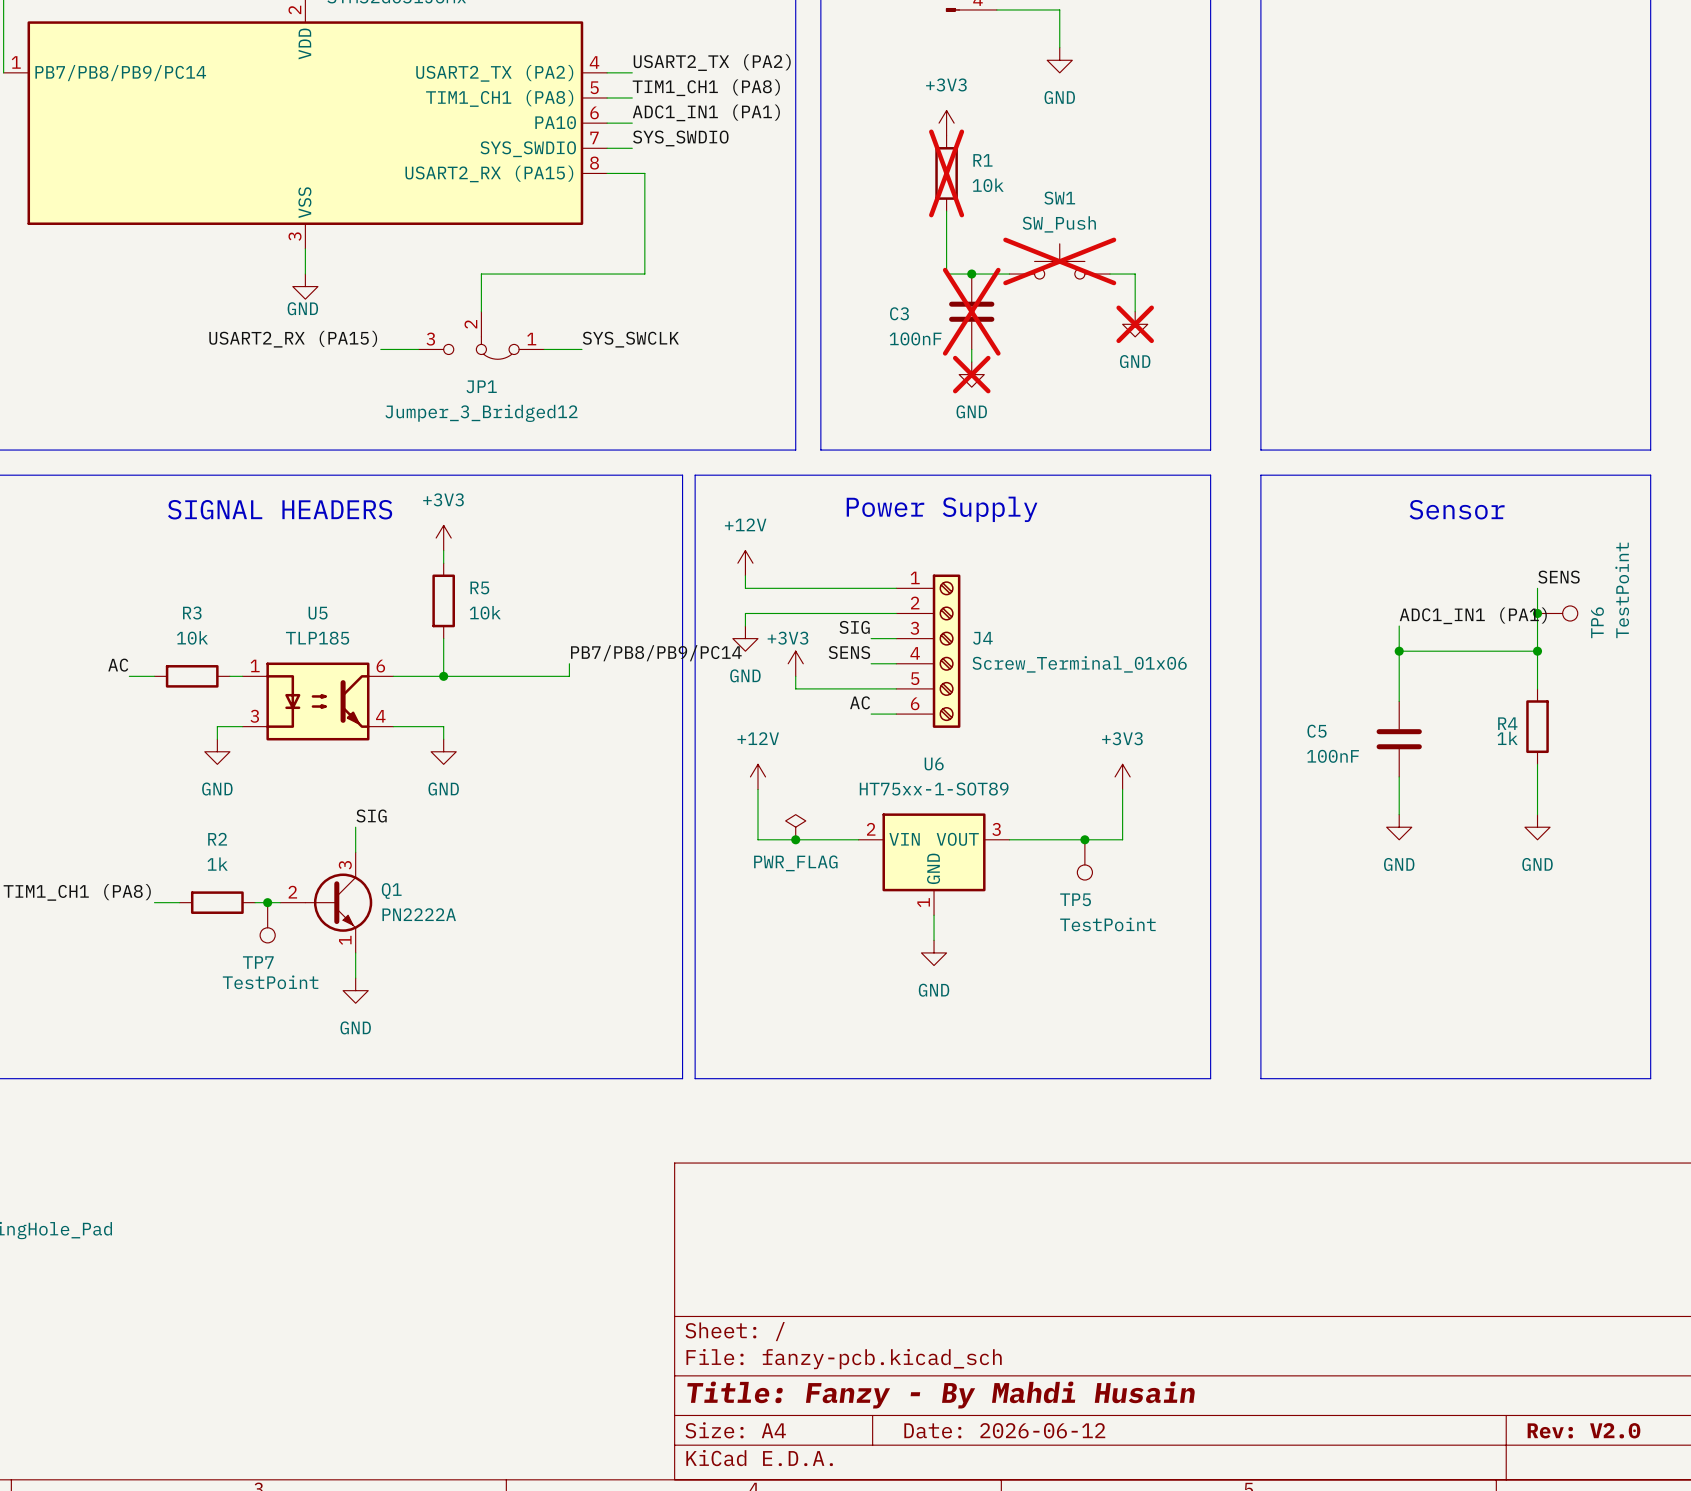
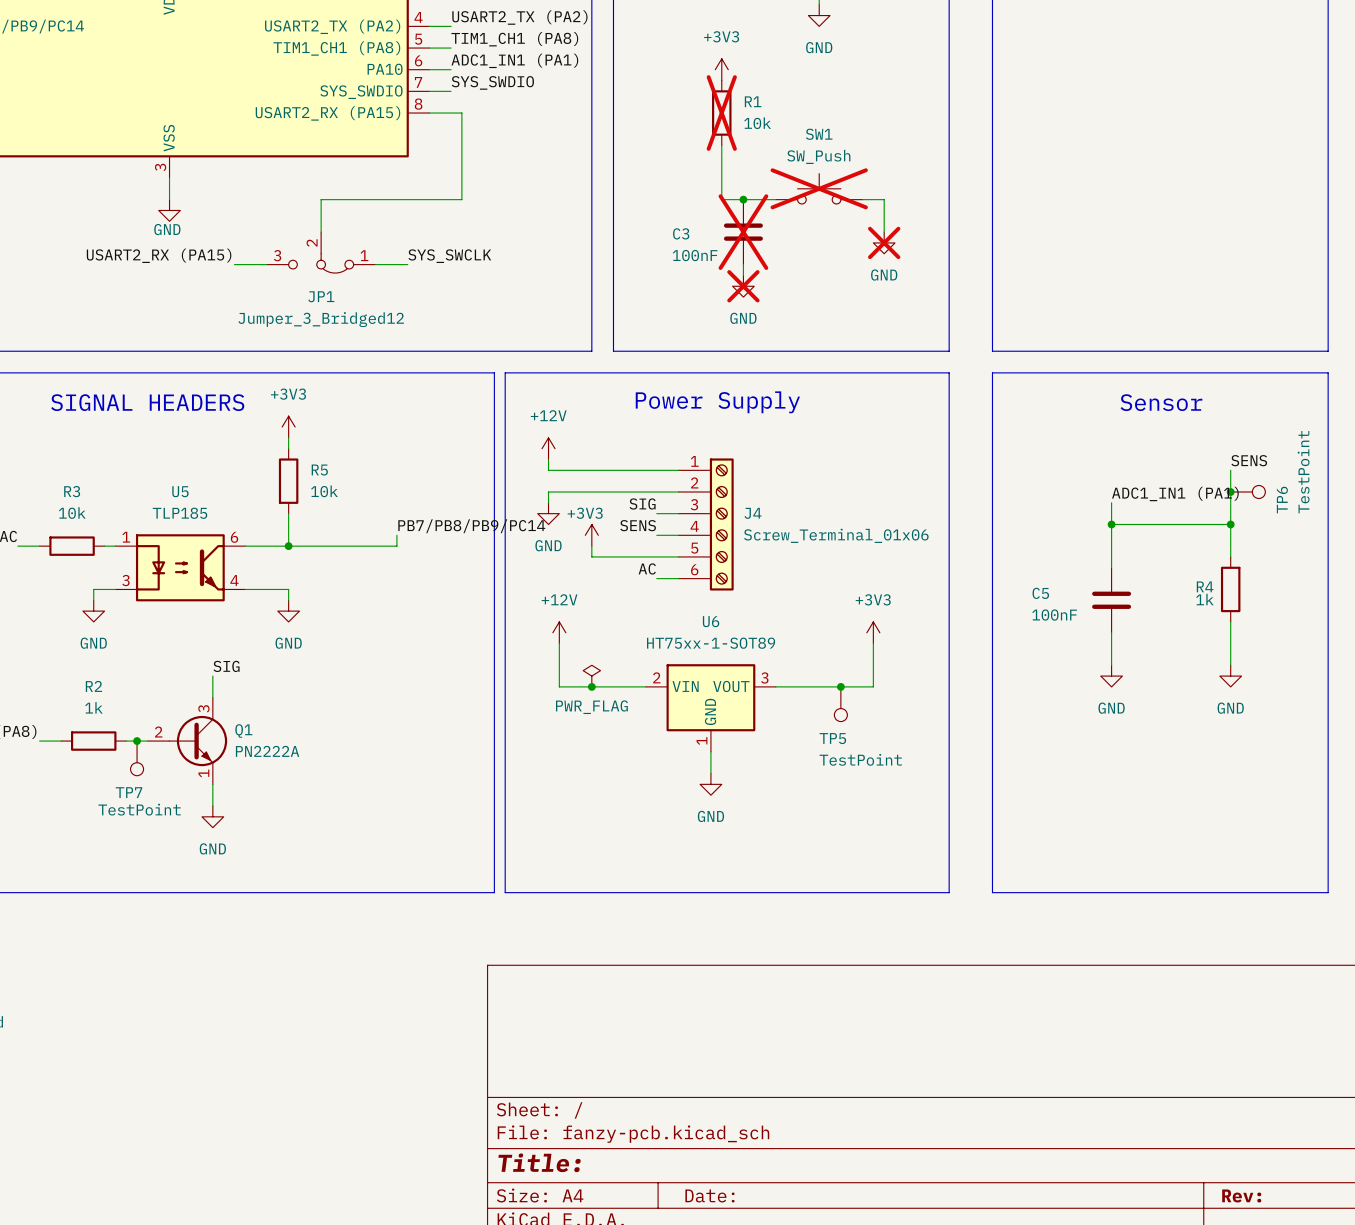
title block: Title: Fanzy - By Mahdi Husain (941, 1395) -> Title: (539, 1162)
title block: Date: 2026-06-12 (1004, 1430) -> Date: (709, 1195)
title block: Rev: V2.0 (1583, 1430) -> Rev: (1241, 1195)

